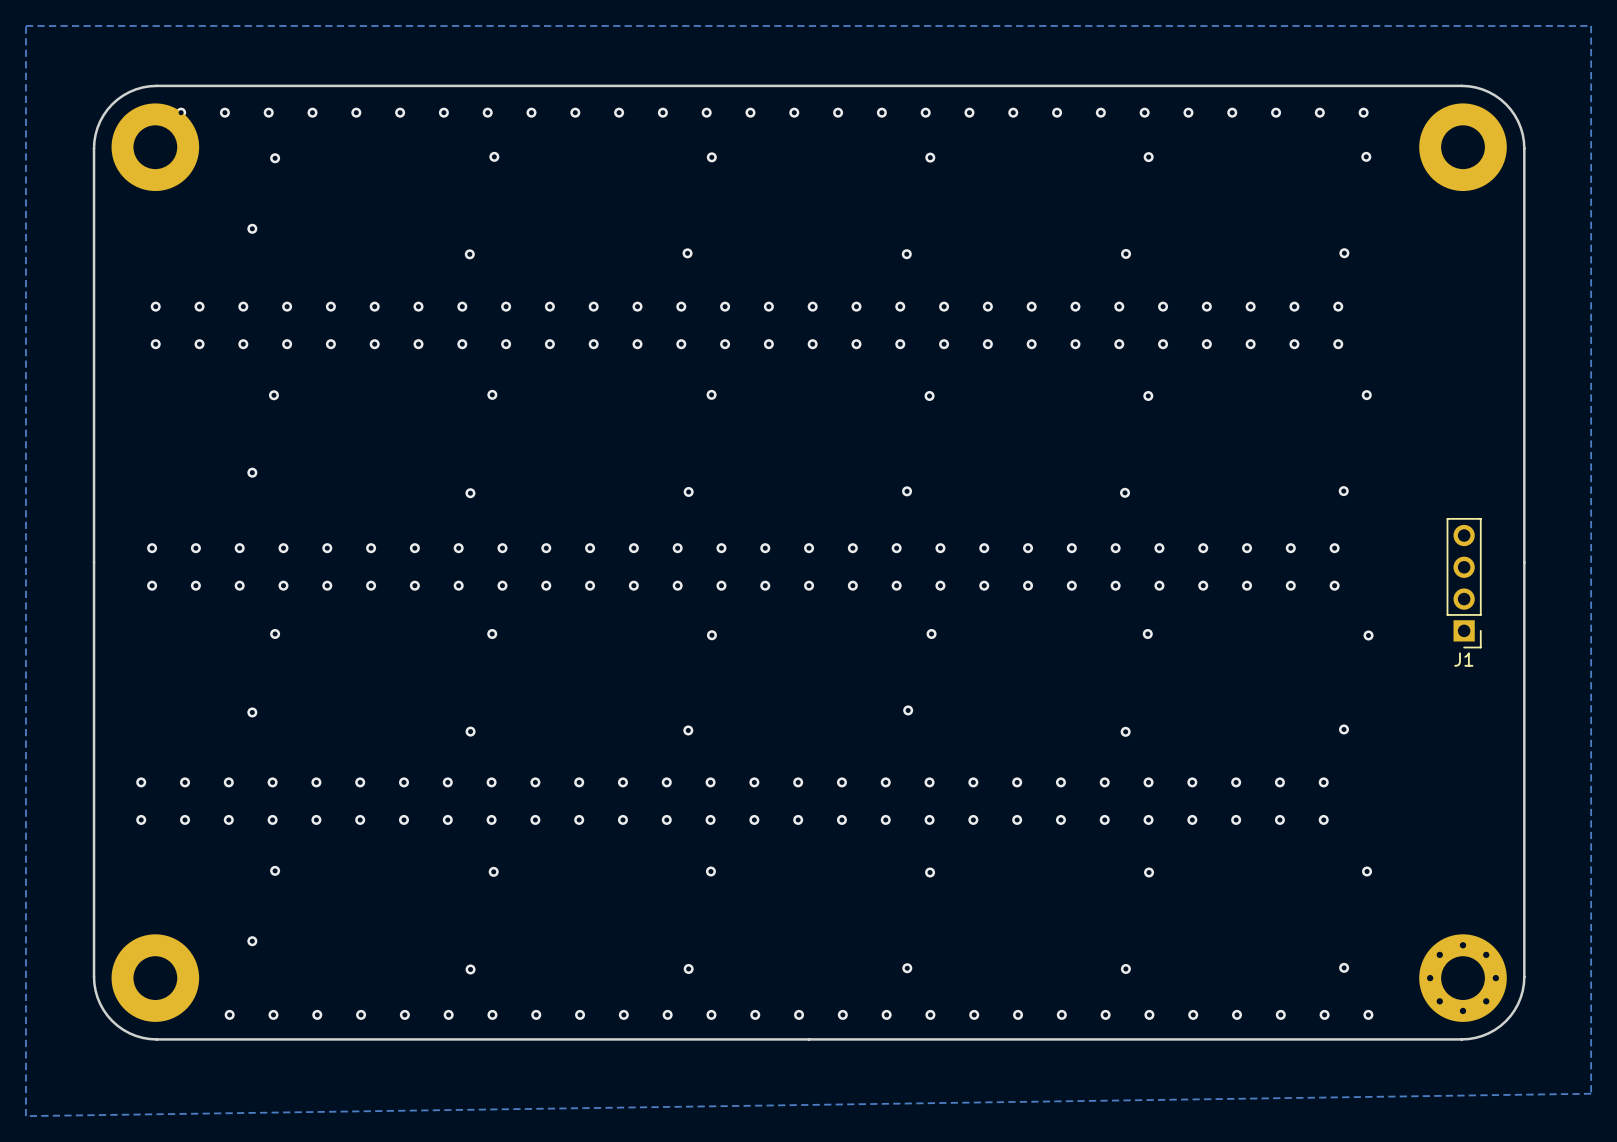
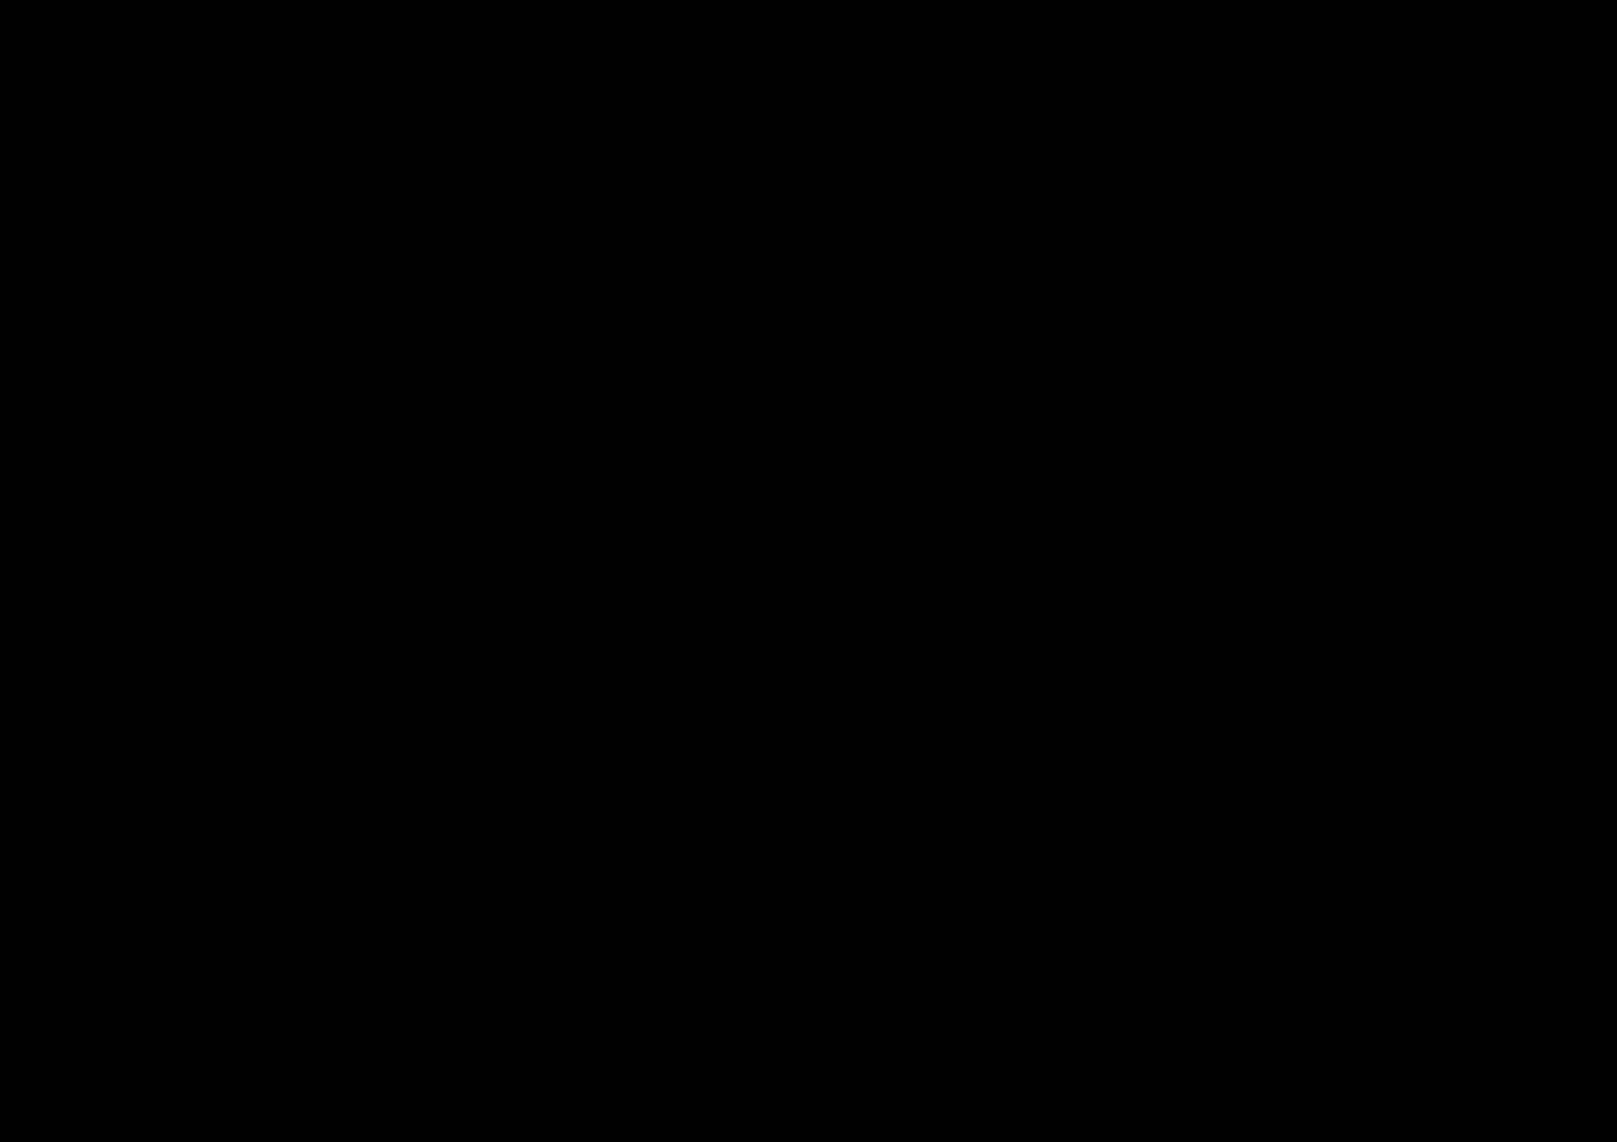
zone outline: (1591, 25) (25, 25) (25, 1116) (1591, 1093) (1591, 25) -> none
board edge: (1461, 85) (156, 85) (135, 89) (123, 95) (107, 109) (100, 121) (95, 134) (94, 148) (94, 976) (97, 997) (103, 1010) (112, 1021) (129, 1033) (142, 1037) (156, 1039) (1461, 1039) (1482, 1035) (1495, 1029) (1505, 1021) (1514, 1010) (1520, 997) (1524, 976) (1524, 148) (1522, 134) (1518, 121) (1505, 104) (1488, 92) (1475, 87) (1461, 85) -> none
via: (181, 112) -> none
via: (224, 112) -> none
via: (268, 112) -> none
via: (312, 112) -> none
via: (356, 112) -> none
via: (400, 112) -> none
via: (443, 112) -> none
via: (487, 112) -> none
via: (531, 112) -> none
via: (575, 112) -> none
via: (619, 112) -> none
via: (662, 112) -> none
via: (706, 112) -> none
via: (750, 112) -> none
via: (794, 112) -> none
via: (838, 112) -> none
via: (881, 112) -> none
via: (925, 112) -> none
via: (969, 112) -> none
via: (1013, 112) -> none
via: (1057, 112) -> none
via: (1100, 112) -> none
via: (1144, 112) -> none
via: (1188, 112) -> none
via: (1232, 112) -> none
via: (1276, 112) -> none
via: (1319, 112) -> none
via: (1363, 112) -> none
part: (155, 147) -> none
part: (1463, 147) -> none
via: (494, 156) -> none
via: (1366, 156) -> none
via: (711, 157) -> none
via: (930, 157) -> none
via: (1148, 157) -> none
via: (275, 158) -> none
via: (252, 228) -> none
via: (687, 253) -> none
via: (1126, 253) -> none
via: (1344, 253) -> none
via: (469, 254) -> none
via: (906, 254) -> none
via: (155, 306) -> none
via: (199, 306) -> none
via: (243, 306) -> none
via: (287, 306) -> none
via: (330, 306) -> none
via: (374, 306) -> none
via: (418, 306) -> none
via: (462, 306) -> none
via: (506, 306) -> none
via: (549, 306) -> none
via: (593, 306) -> none
via: (637, 306) -> none
via: (681, 306) -> none
via: (725, 306) -> none
via: (768, 306) -> none
via: (812, 306) -> none
via: (856, 306) -> none
via: (900, 306) -> none
via: (944, 306) -> none
via: (987, 306) -> none
via: (1031, 306) -> none
via: (1075, 306) -> none
via: (1119, 306) -> none
via: (1163, 306) -> none
via: (1206, 306) -> none
via: (1250, 306) -> none
via: (1294, 306) -> none
via: (1338, 306) -> none
via: (155, 344) -> none
via: (199, 344) -> none
via: (243, 344) -> none
via: (287, 344) -> none
via: (330, 344) -> none
via: (374, 344) -> none
via: (418, 344) -> none
via: (462, 344) -> none
via: (506, 344) -> none
via: (549, 344) -> none
via: (593, 344) -> none
via: (637, 344) -> none
via: (681, 344) -> none
via: (725, 344) -> none
via: (768, 344) -> none
via: (812, 344) -> none
via: (856, 344) -> none
via: (900, 344) -> none
via: (944, 344) -> none
via: (987, 344) -> none
via: (1031, 344) -> none
via: (1075, 344) -> none
via: (1119, 344) -> none
via: (1163, 344) -> none
via: (1206, 344) -> none
via: (1250, 344) -> none
via: (1294, 344) -> none
via: (1338, 344) -> none
via: (492, 394) -> none
via: (711, 394) -> none
via: (273, 395) -> none
via: (929, 395) -> none
via: (1148, 395) -> none
via: (1366, 395) -> none
via: (252, 472) -> none
via: (688, 491) -> none
via: (907, 491) -> none
via: (1343, 491) -> none
via: (1125, 492) -> none
via: (470, 493) -> none
via: (152, 548) -> none
via: (195, 548) -> none
via: (239, 548) -> none
via: (283, 548) -> none
via: (327, 548) -> none
via: (371, 548) -> none
via: (414, 548) -> none
via: (458, 548) -> none
via: (502, 548) -> none
via: (546, 548) -> none
via: (590, 548) -> none
via: (633, 548) -> none
via: (677, 548) -> none
via: (721, 548) -> none
via: (765, 548) -> none
via: (809, 548) -> none
via: (852, 548) -> none
via: (896, 548) -> none
via: (940, 548) -> none
via: (984, 548) -> none
via: (1028, 548) -> none
via: (1071, 548) -> none
via: (1115, 548) -> none
via: (1159, 548) -> none
via: (1203, 548) -> none
via: (1247, 548) -> none
via: (1290, 548) -> none
via: (1334, 548) -> none
J1: (1464, 583) -> none
via: (152, 585) -> none
via: (195, 585) -> none
via: (239, 585) -> none
via: (283, 585) -> none
via: (327, 585) -> none
via: (371, 585) -> none
via: (414, 585) -> none
via: (458, 585) -> none
via: (502, 585) -> none
via: (546, 585) -> none
via: (590, 585) -> none
via: (633, 585) -> none
via: (677, 585) -> none
via: (721, 585) -> none
via: (765, 585) -> none
via: (809, 585) -> none
via: (852, 585) -> none
via: (896, 585) -> none
via: (940, 585) -> none
via: (984, 585) -> none
via: (1028, 585) -> none
via: (1071, 585) -> none
via: (1115, 585) -> none
via: (1159, 585) -> none
via: (1203, 585) -> none
via: (1247, 585) -> none
via: (1290, 585) -> none
via: (1334, 585) -> none
via: (275, 633) -> none
via: (492, 633) -> none
via: (931, 633) -> none
via: (1147, 633) -> none
via: (711, 635) -> none
via: (1368, 635) -> none
via: (908, 710) -> none
via: (252, 712) -> none
via: (1344, 729) -> none
via: (688, 730) -> none
via: (470, 731) -> none
via: (1125, 731) -> none
via: (141, 782) -> none
via: (185, 782) -> none
via: (228, 782) -> none
via: (272, 782) -> none
via: (316, 782) -> none
via: (360, 782) -> none
via: (403, 782) -> none
via: (447, 782) -> none
via: (491, 782) -> none
via: (535, 782) -> none
via: (579, 782) -> none
via: (622, 782) -> none
via: (666, 782) -> none
via: (710, 782) -> none
via: (754, 782) -> none
via: (798, 782) -> none
via: (841, 782) -> none
via: (885, 782) -> none
via: (929, 782) -> none
via: (973, 782) -> none
via: (1017, 782) -> none
via: (1060, 782) -> none
via: (1104, 782) -> none
via: (1148, 782) -> none
via: (1192, 782) -> none
via: (1236, 782) -> none
via: (1279, 782) -> none
via: (1323, 782) -> none
via: (141, 819) -> none
via: (185, 819) -> none
via: (228, 819) -> none
via: (272, 819) -> none
via: (316, 819) -> none
via: (360, 819) -> none
via: (403, 819) -> none
via: (447, 819) -> none
via: (491, 819) -> none
via: (535, 819) -> none
via: (579, 819) -> none
via: (622, 819) -> none
via: (666, 819) -> none
via: (710, 819) -> none
via: (754, 819) -> none
via: (798, 819) -> none
via: (841, 819) -> none
via: (885, 819) -> none
via: (929, 819) -> none
via: (973, 819) -> none
via: (1017, 819) -> none
via: (1060, 819) -> none
via: (1104, 819) -> none
via: (1148, 819) -> none
via: (1192, 819) -> none
via: (1236, 819) -> none
via: (1279, 819) -> none
via: (1323, 819) -> none
via: (275, 870) -> none
via: (493, 871) -> none
via: (710, 871) -> none
via: (1367, 871) -> none
via: (930, 872) -> none
via: (1149, 872) -> none
via: (252, 941) -> none
via: (1344, 967) -> none
via: (688, 968) -> none
via: (907, 968) -> none
via: (1125, 968) -> none
via: (470, 969) -> none
part: (155, 978) -> none
part: (1463, 978) -> none
via: (229, 1014) -> none
via: (273, 1014) -> none
via: (317, 1014) -> none
via: (361, 1014) -> none
via: (404, 1014) -> none
via: (448, 1014) -> none
via: (492, 1014) -> none
via: (536, 1014) -> none
via: (580, 1014) -> none
via: (623, 1014) -> none
via: (667, 1014) -> none
via: (711, 1014) -> none
via: (755, 1014) -> none
via: (799, 1014) -> none
via: (842, 1014) -> none
via: (886, 1014) -> none
via: (930, 1014) -> none
via: (974, 1014) -> none
via: (1018, 1014) -> none
via: (1061, 1014) -> none
via: (1105, 1014) -> none
via: (1149, 1014) -> none
via: (1193, 1014) -> none
via: (1237, 1014) -> none
via: (1280, 1014) -> none
via: (1324, 1014) -> none
via: (1368, 1014) -> none

